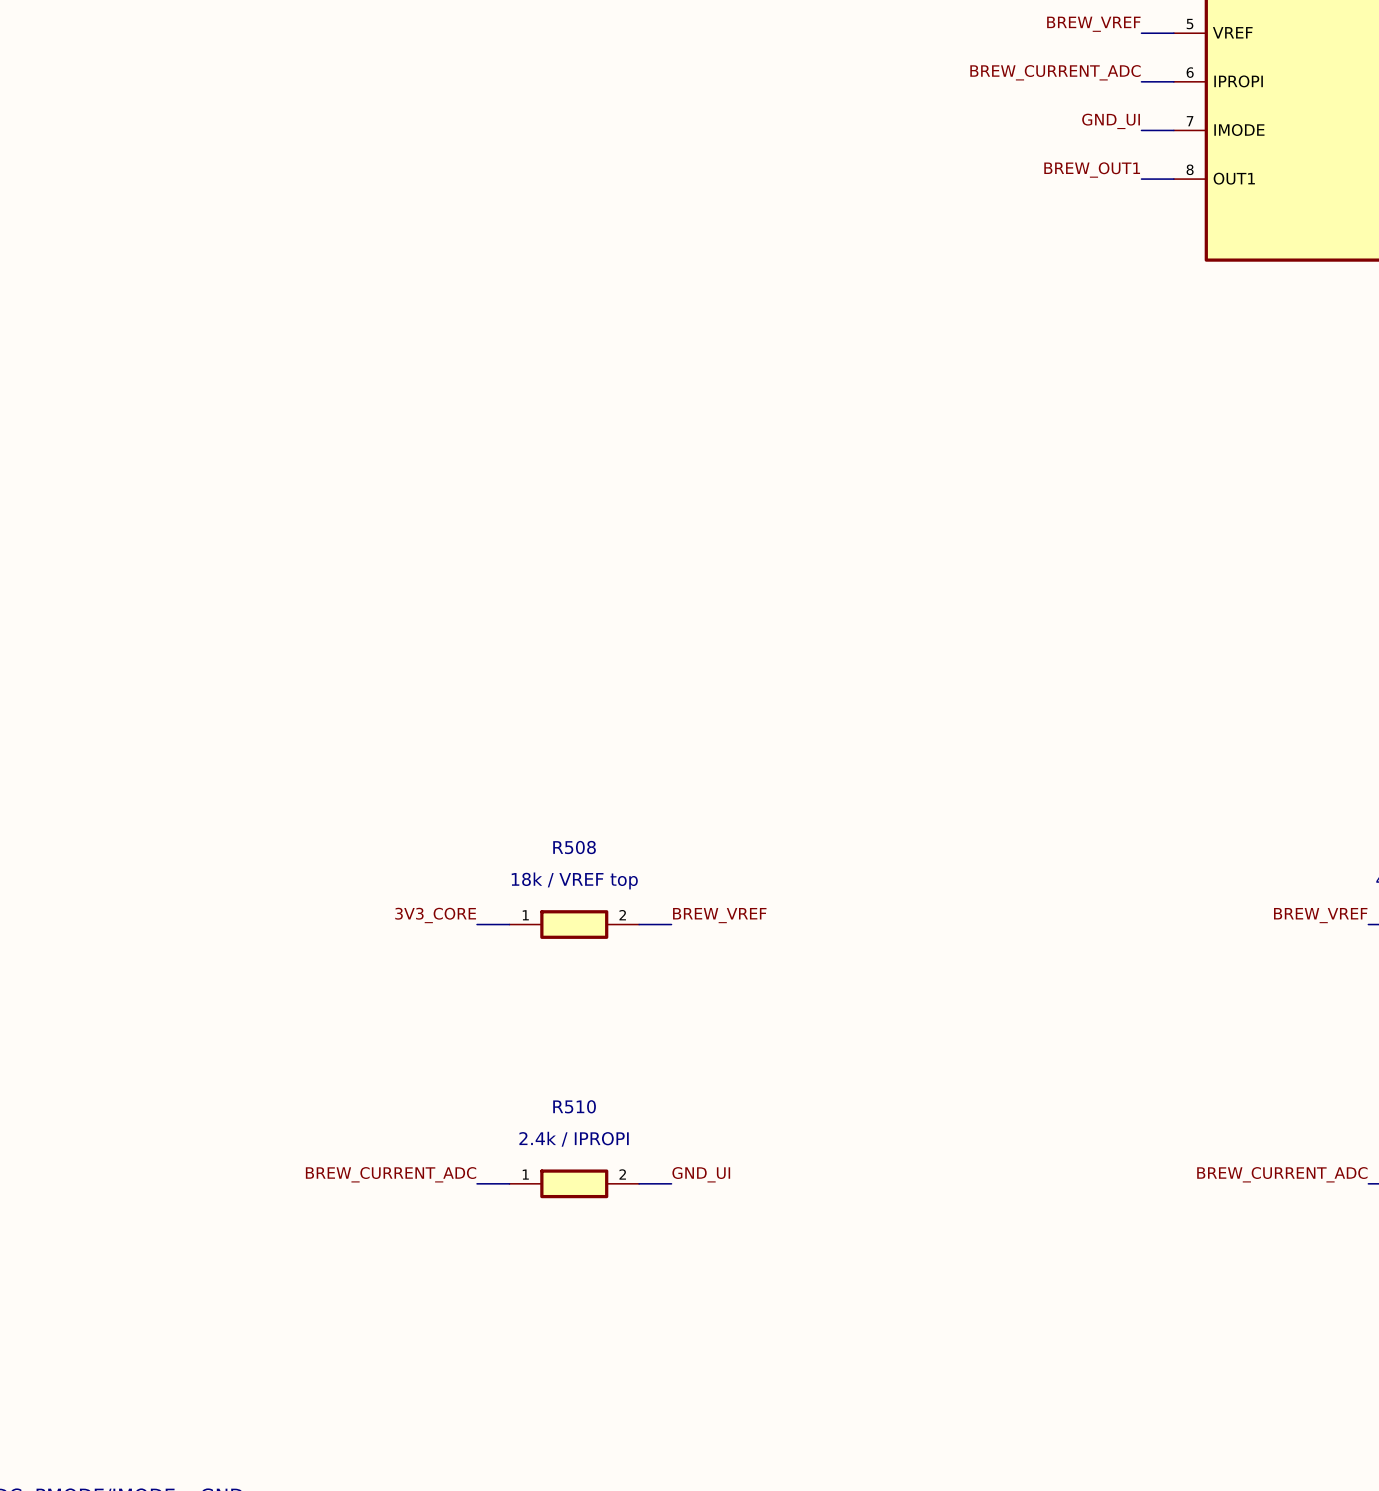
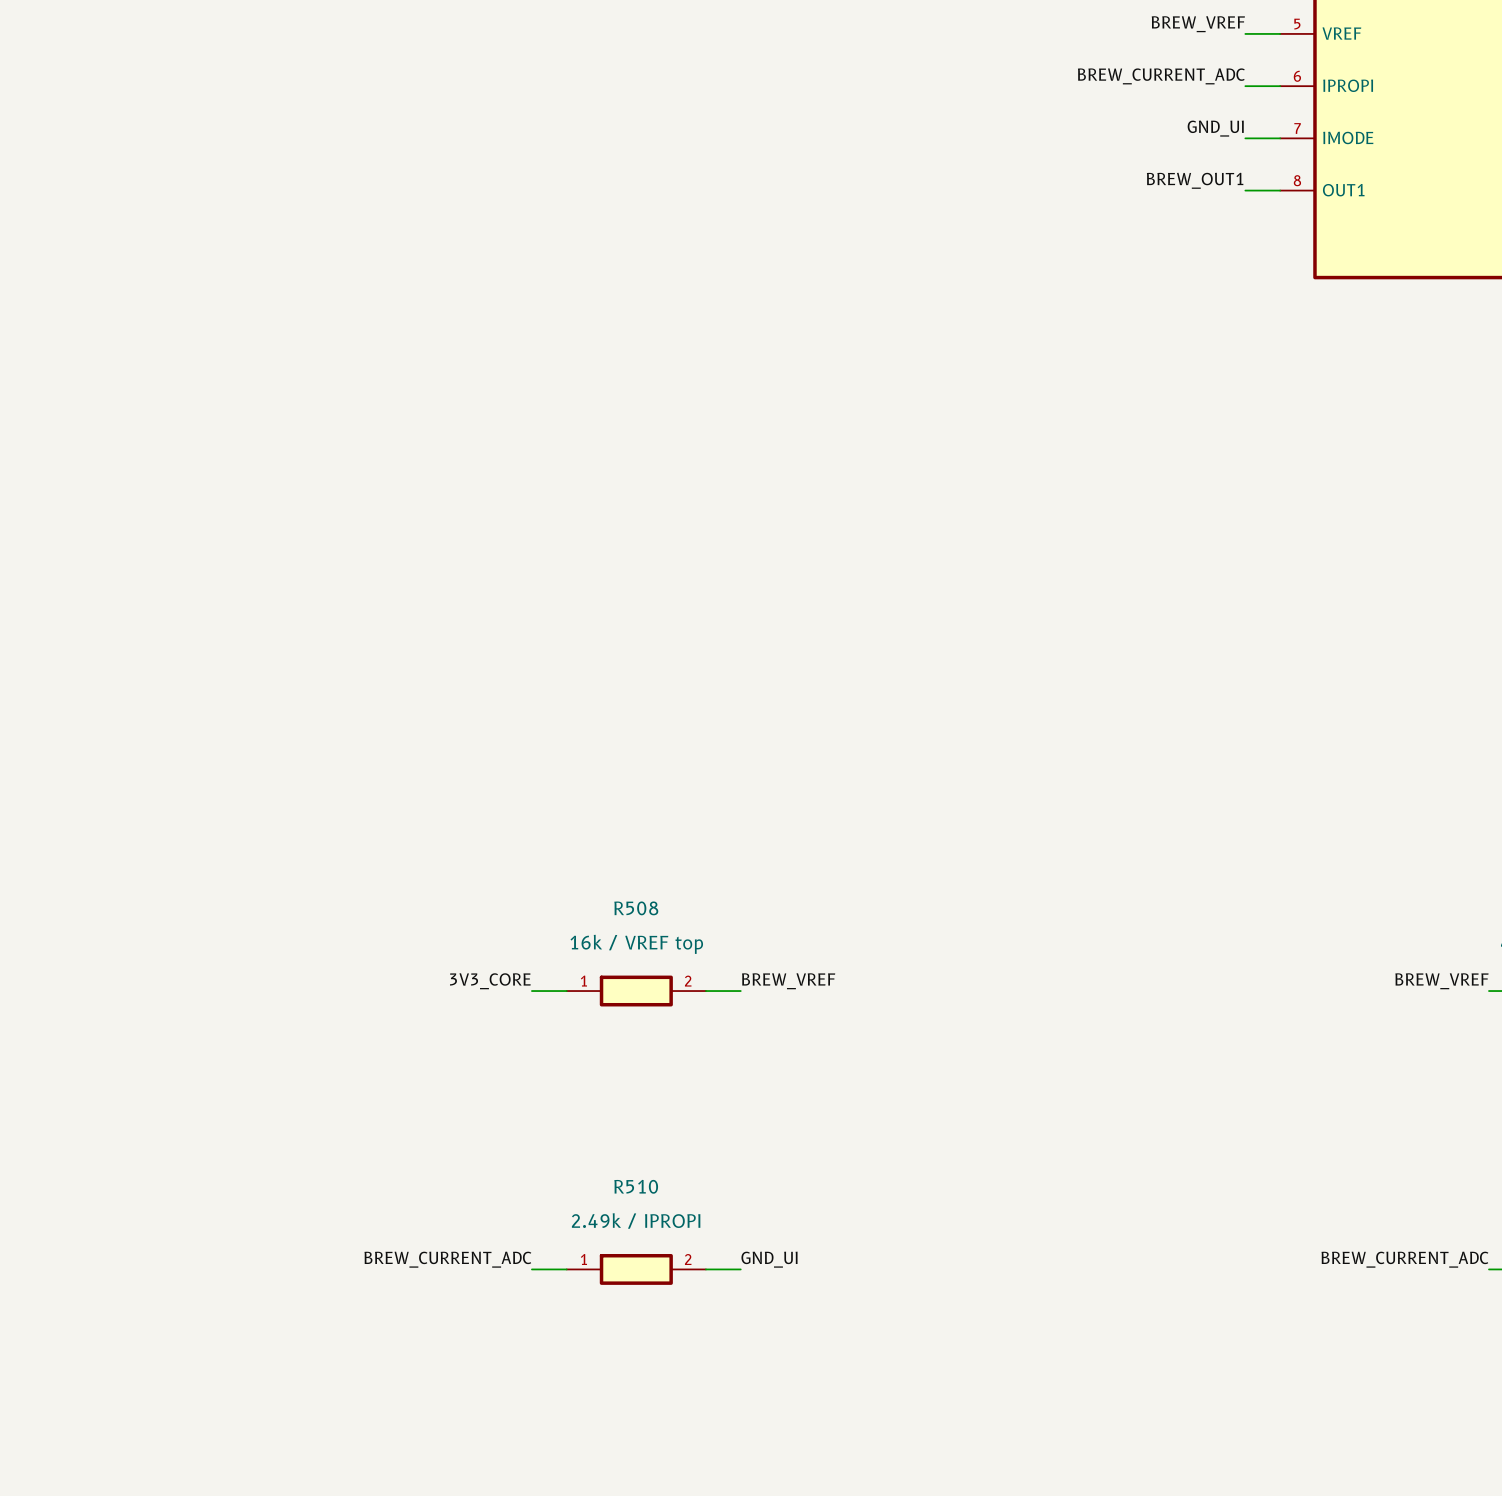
R508 value: 18k / VREF top (574, 880) -> 16k / VREF top (636, 944)
R510 value: 2.4k / IPROPI (574, 1139) -> 2.49k / IPROPI (636, 1220)

